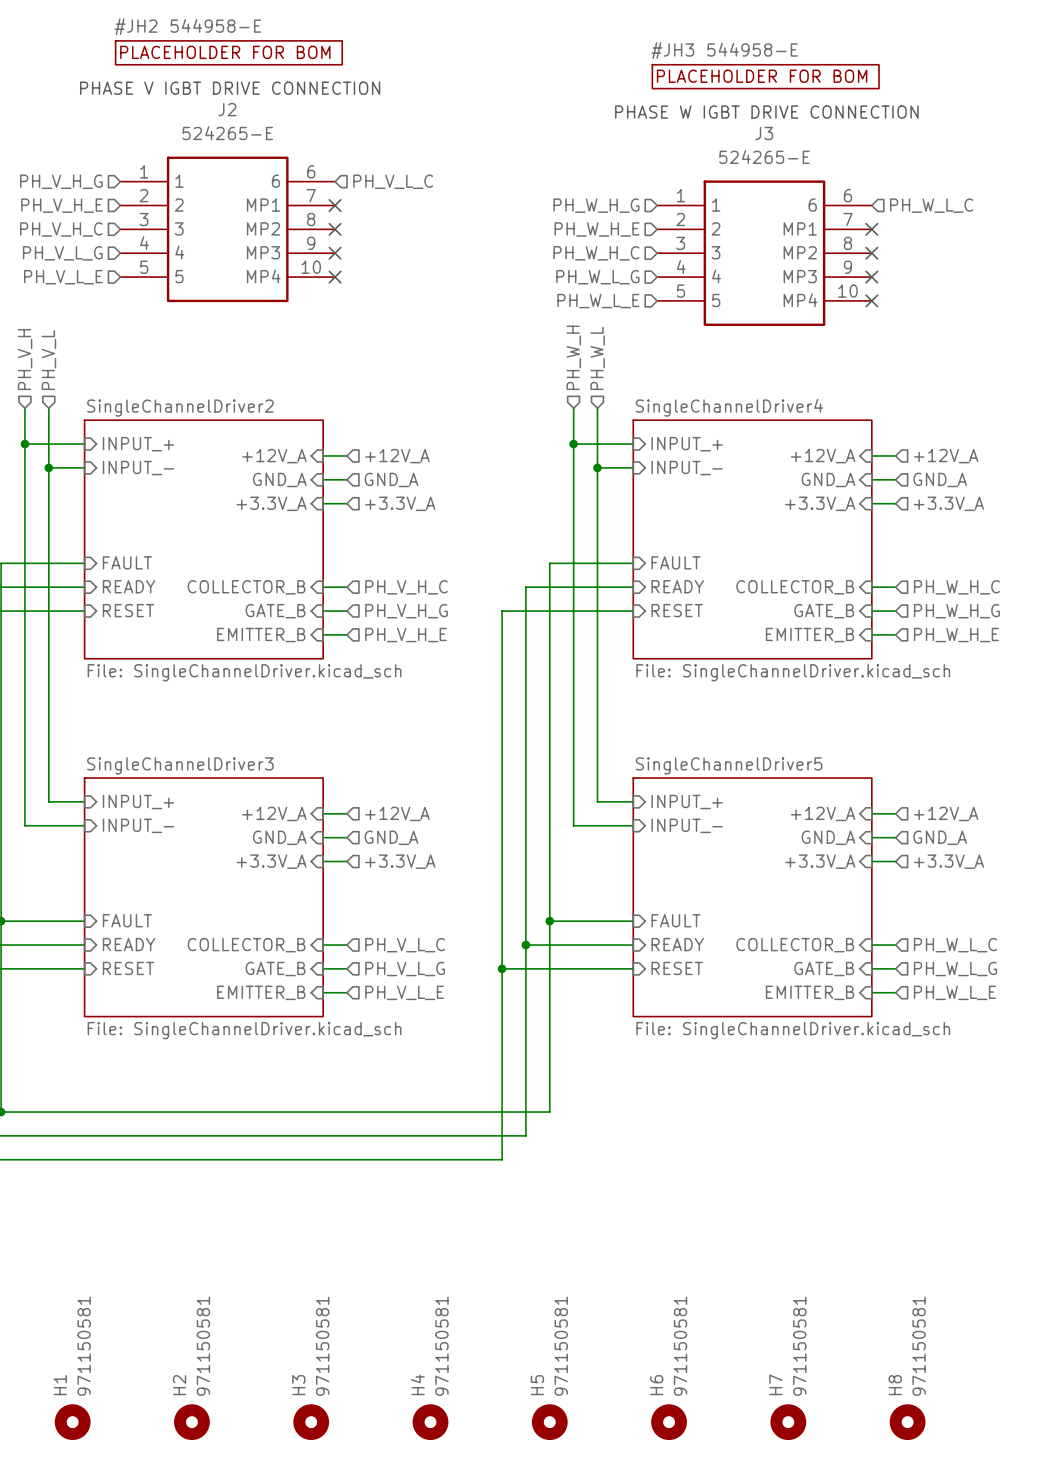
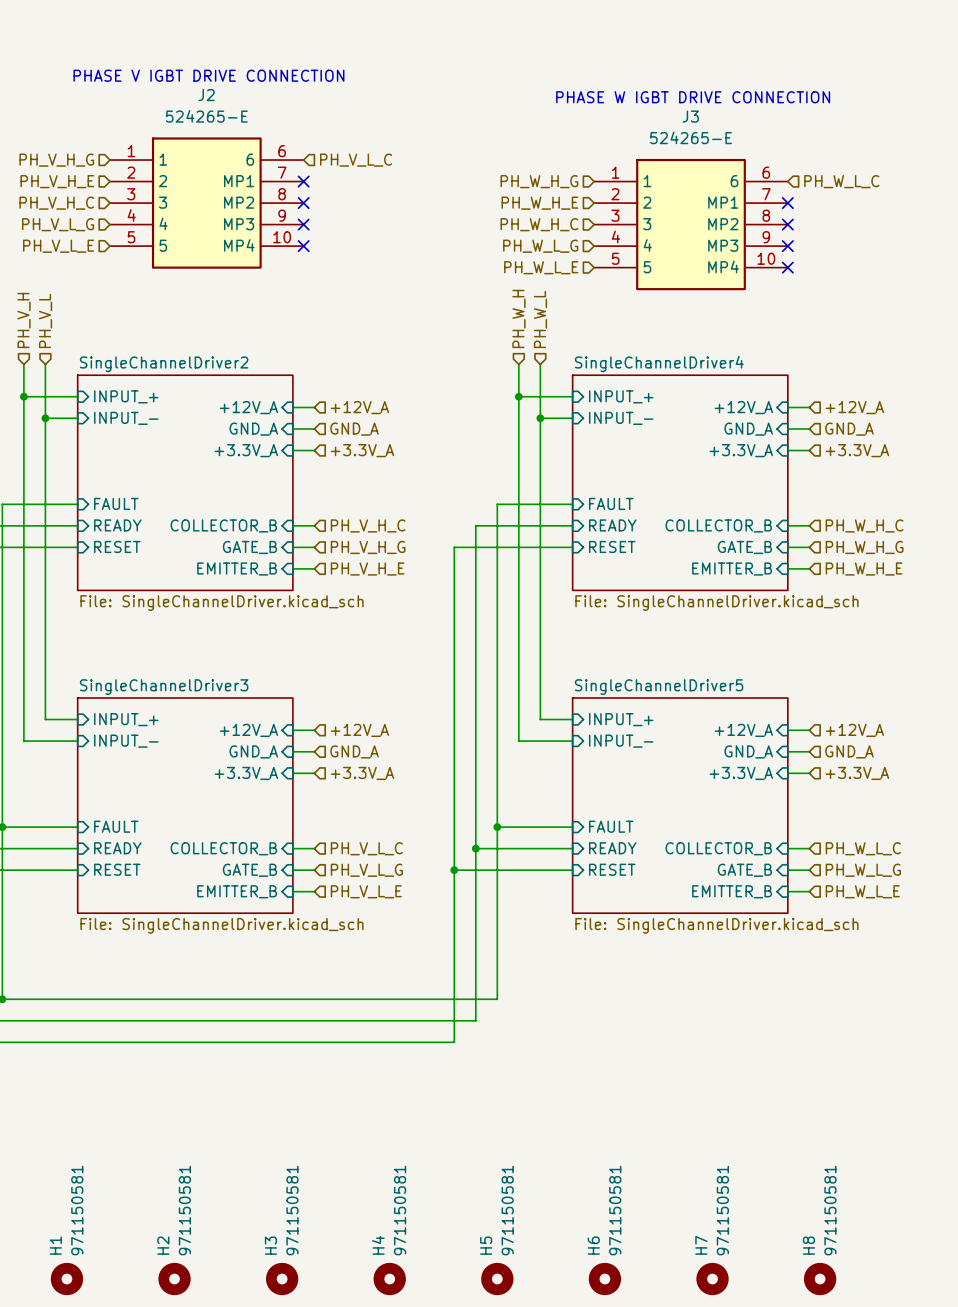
drawing: [115, 40, 343, 65] -> none
drawing: [652, 64, 879, 89] -> none

